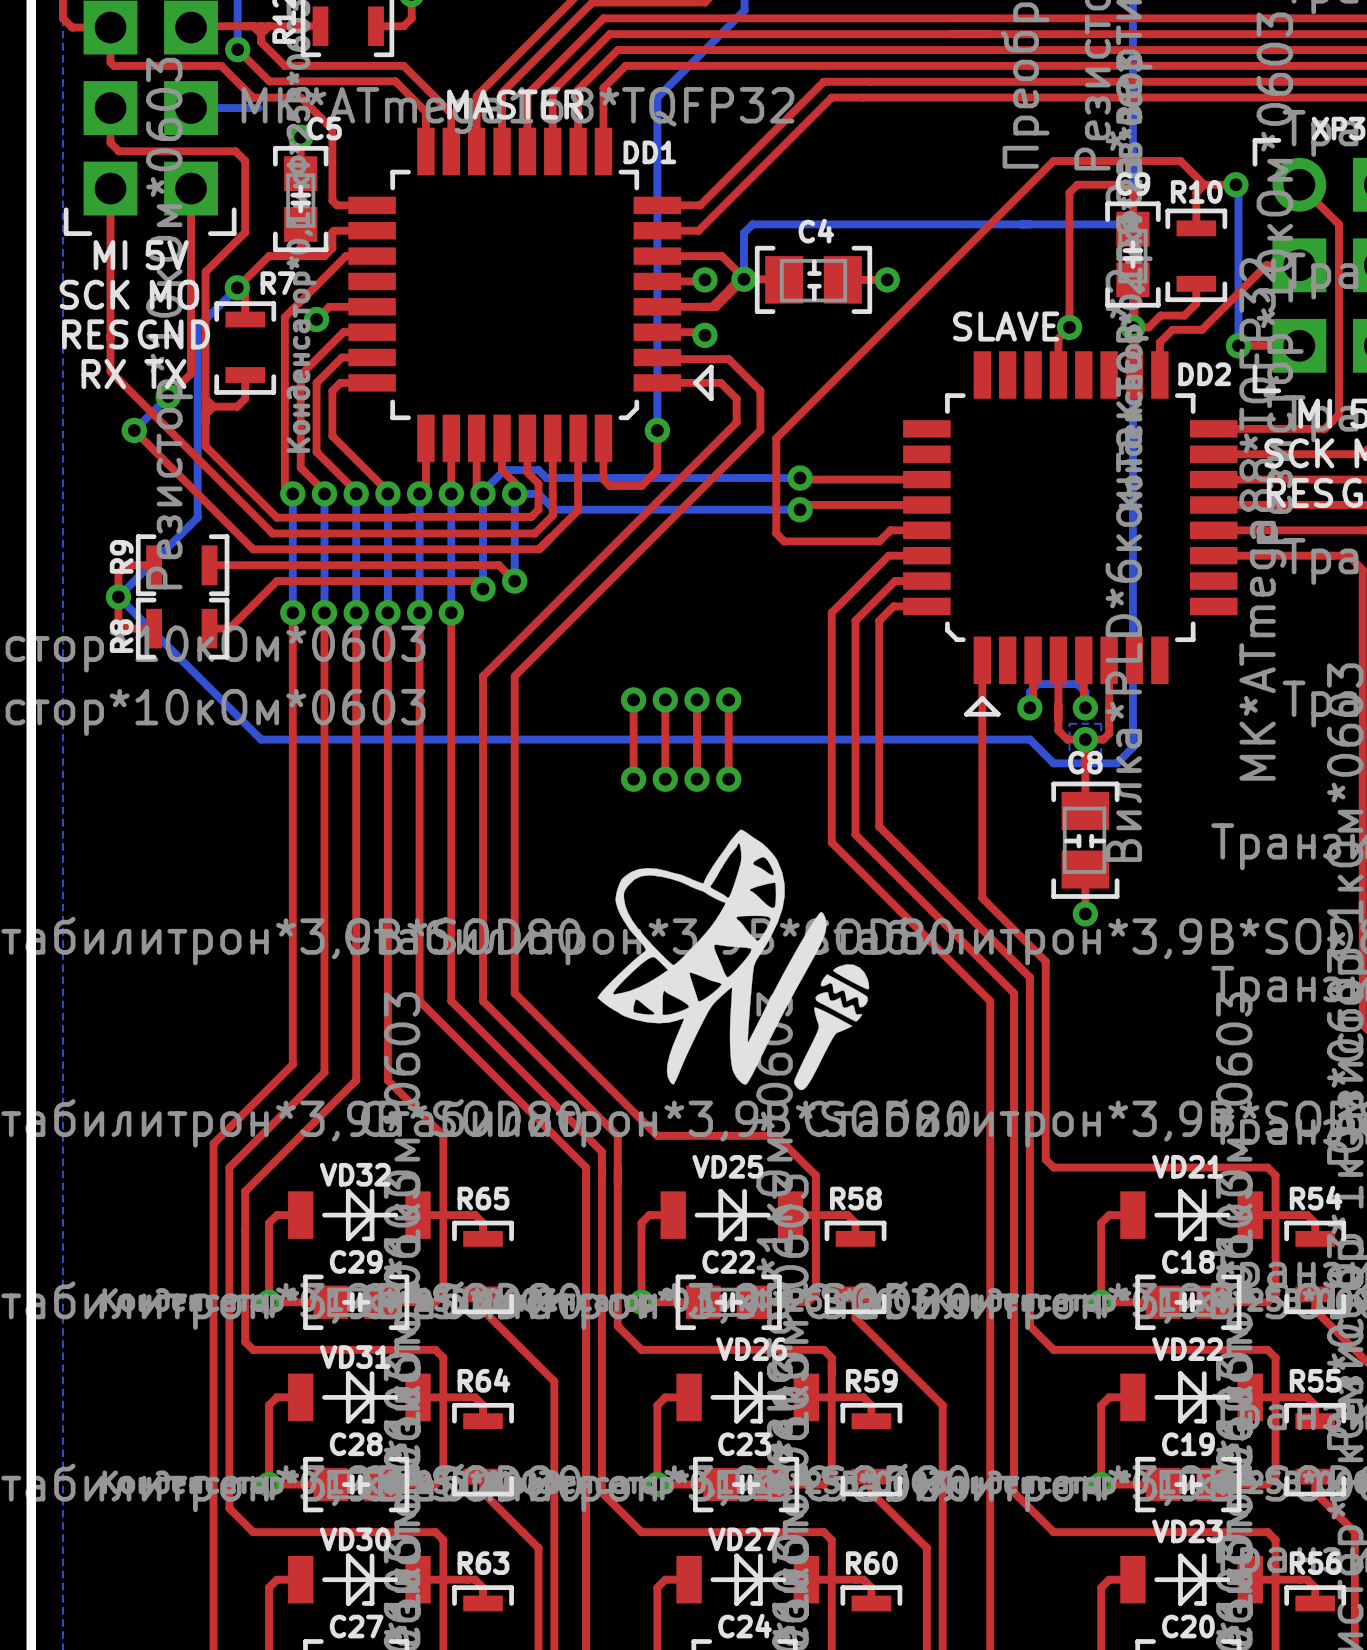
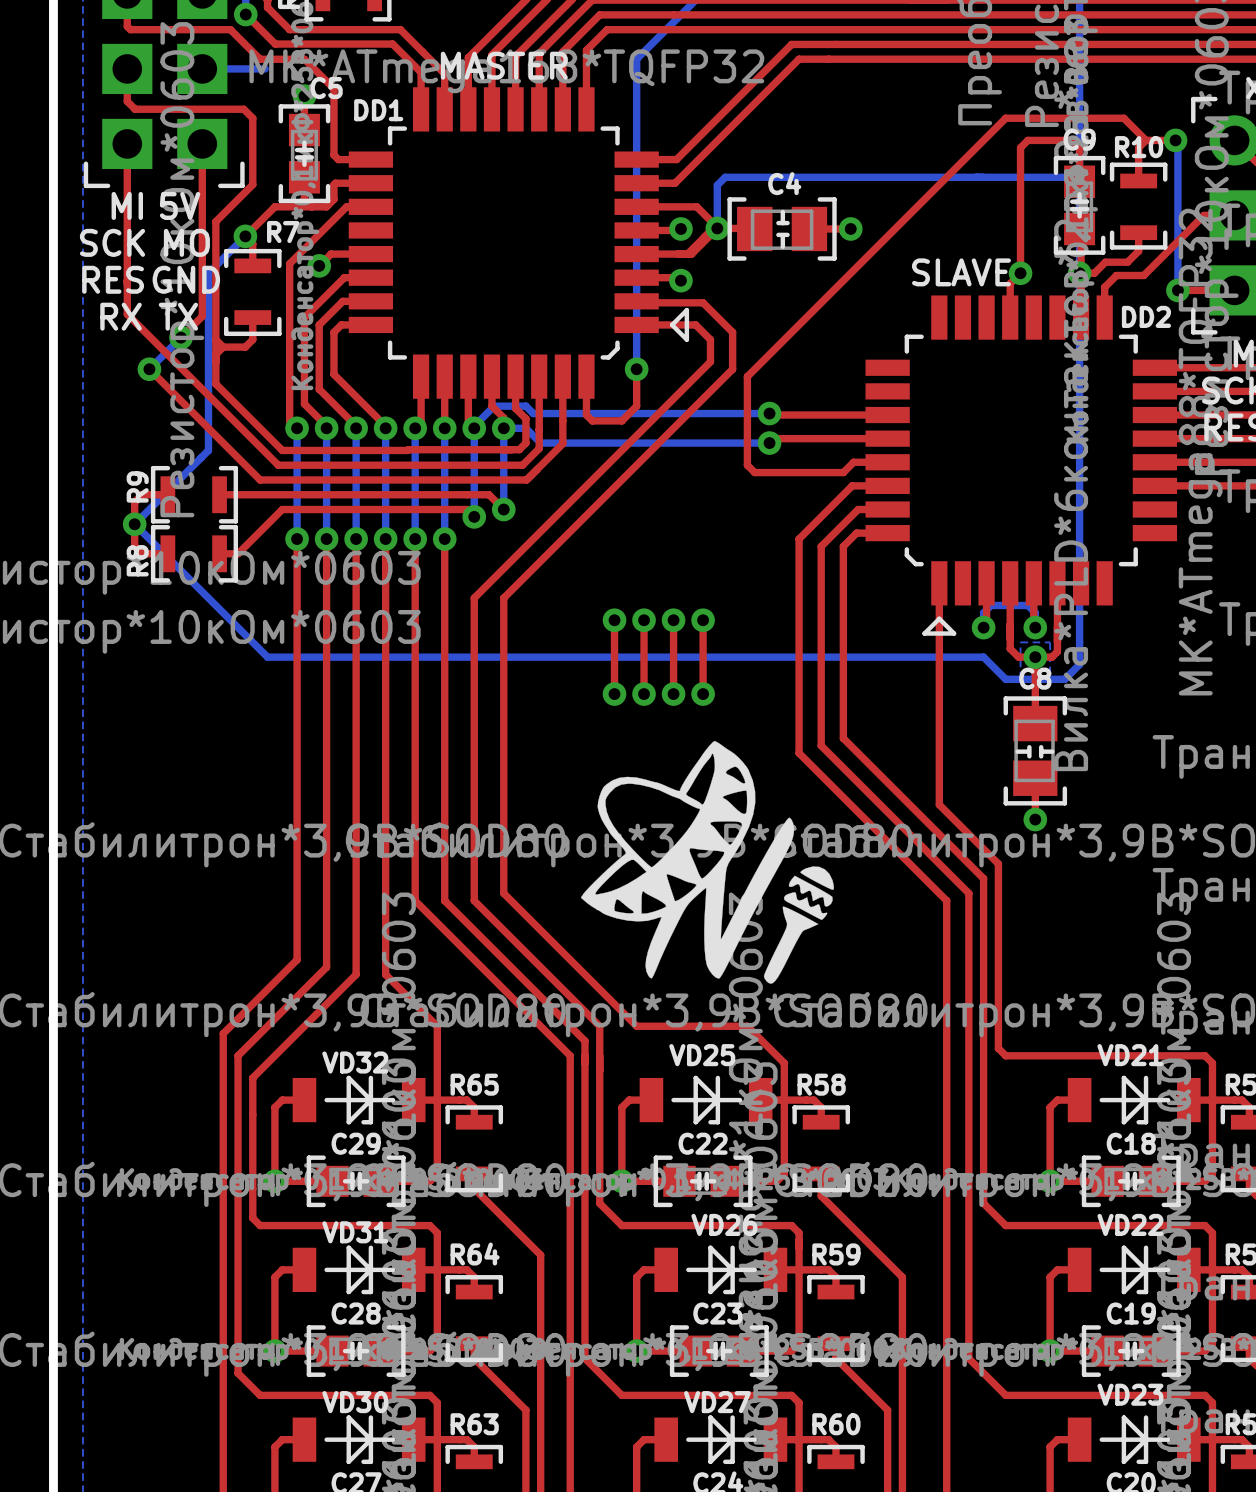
DD1 name position: DD1 (649, 152) -> DD1 (378, 110)

